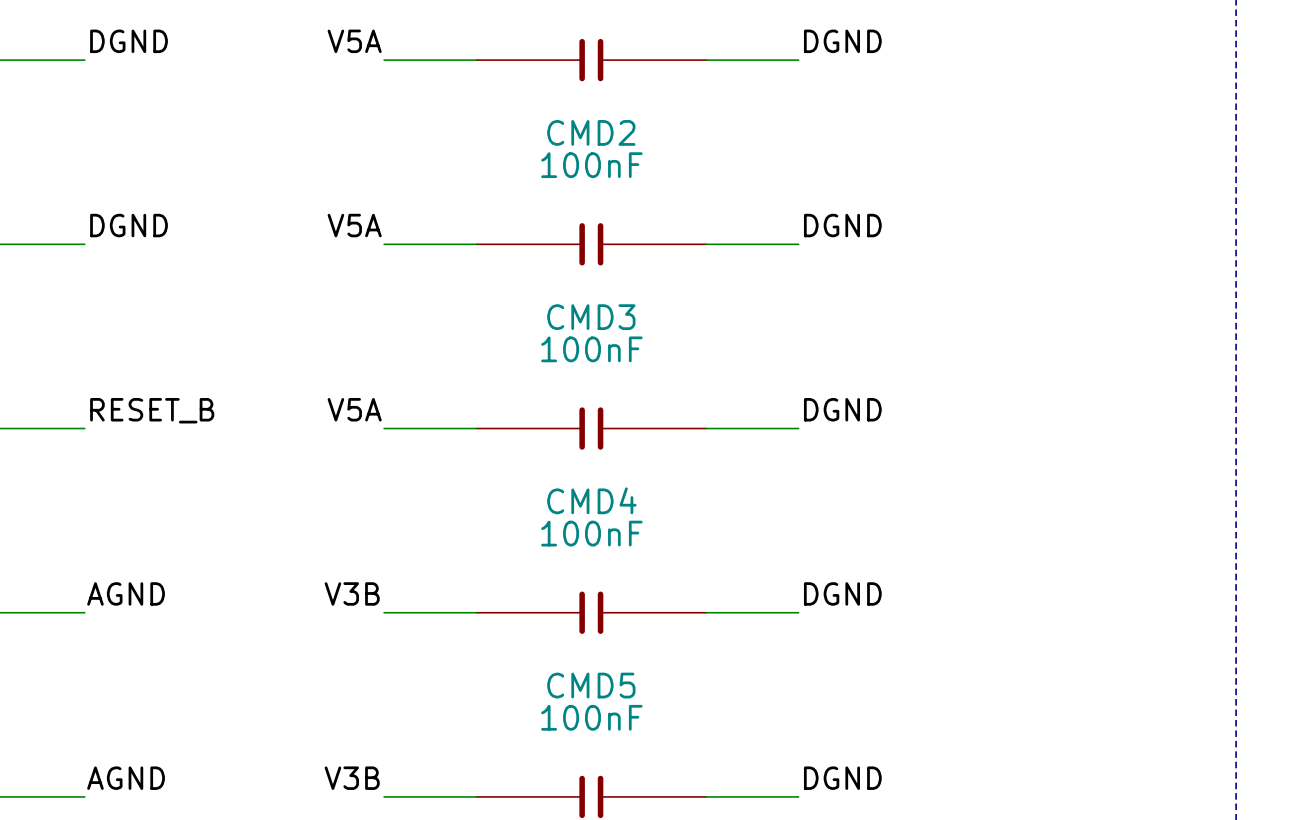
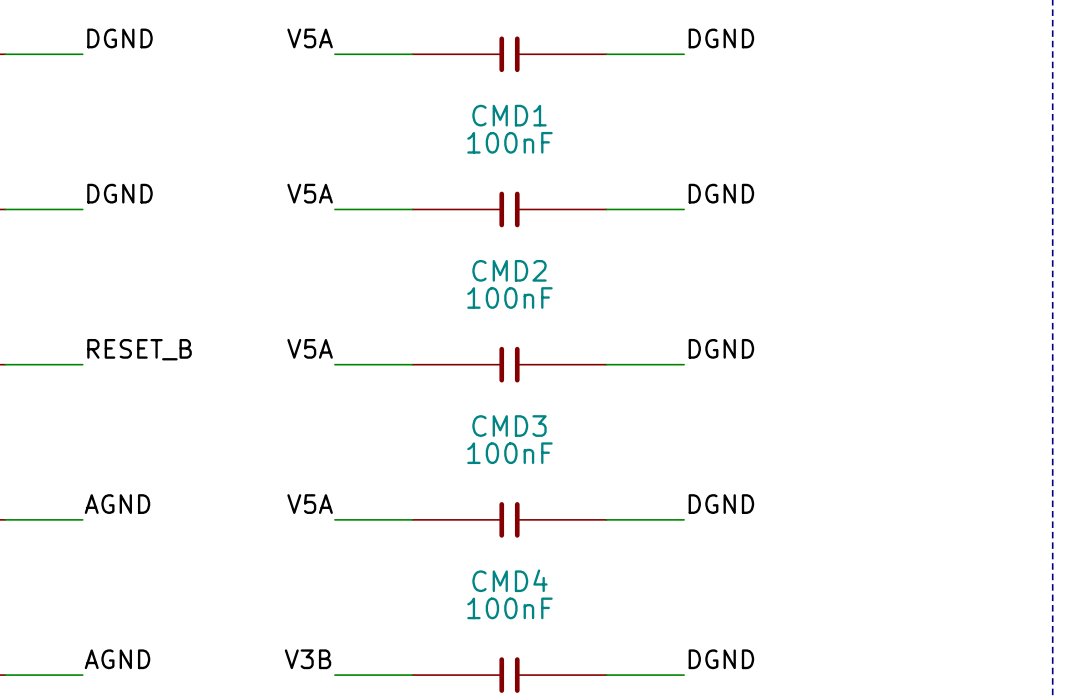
CMD2 name: CMD2 (591, 132) -> CMD1 (509, 115)
CMD3 name: CMD3 (591, 317) -> CMD2 (509, 270)
CMD4 name: CMD4 (591, 500) -> CMD3 (509, 426)
label: V3B (352, 593) -> V5A (310, 504)
CMD5 name: CMD5 (591, 685) -> CMD4 (509, 580)

